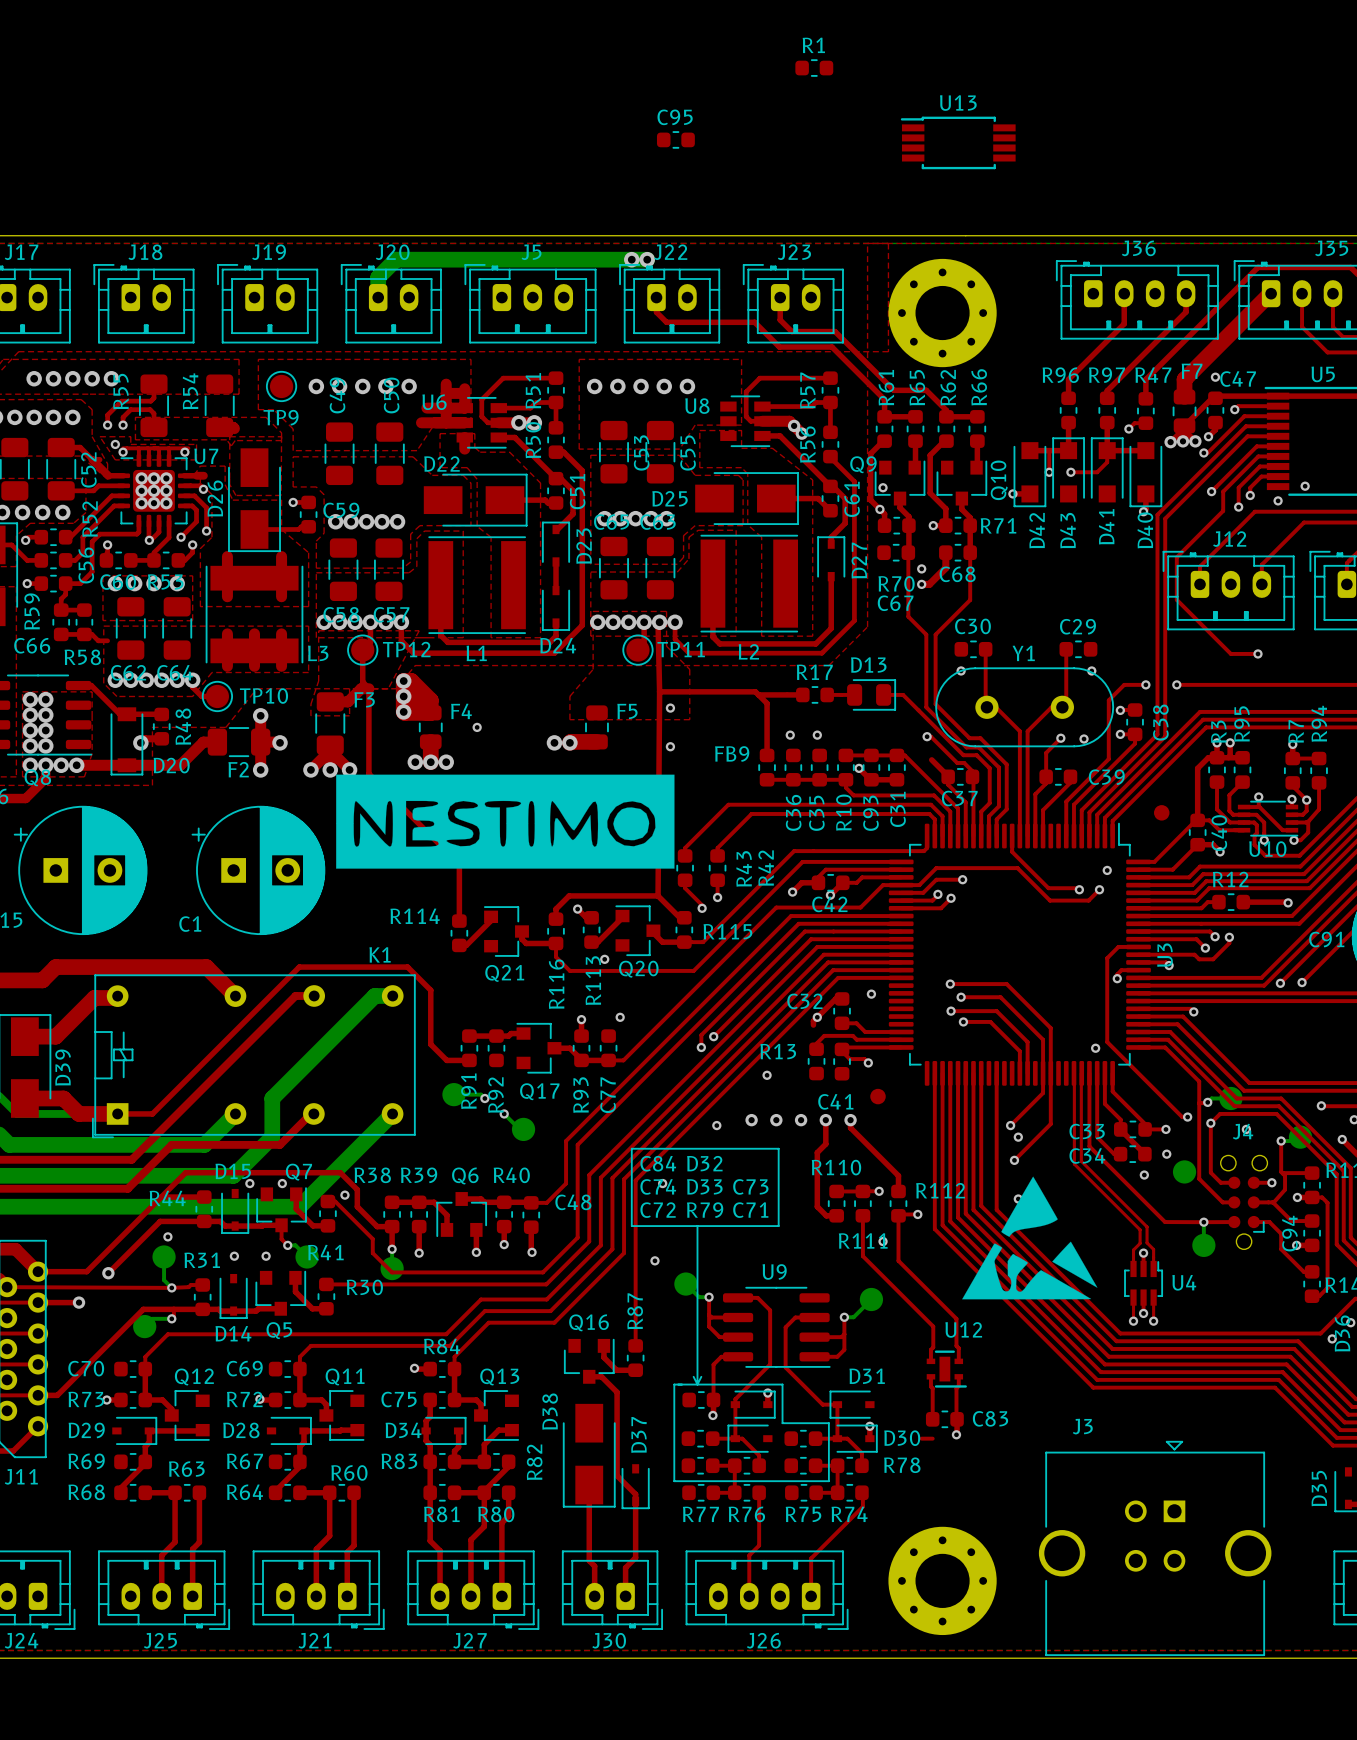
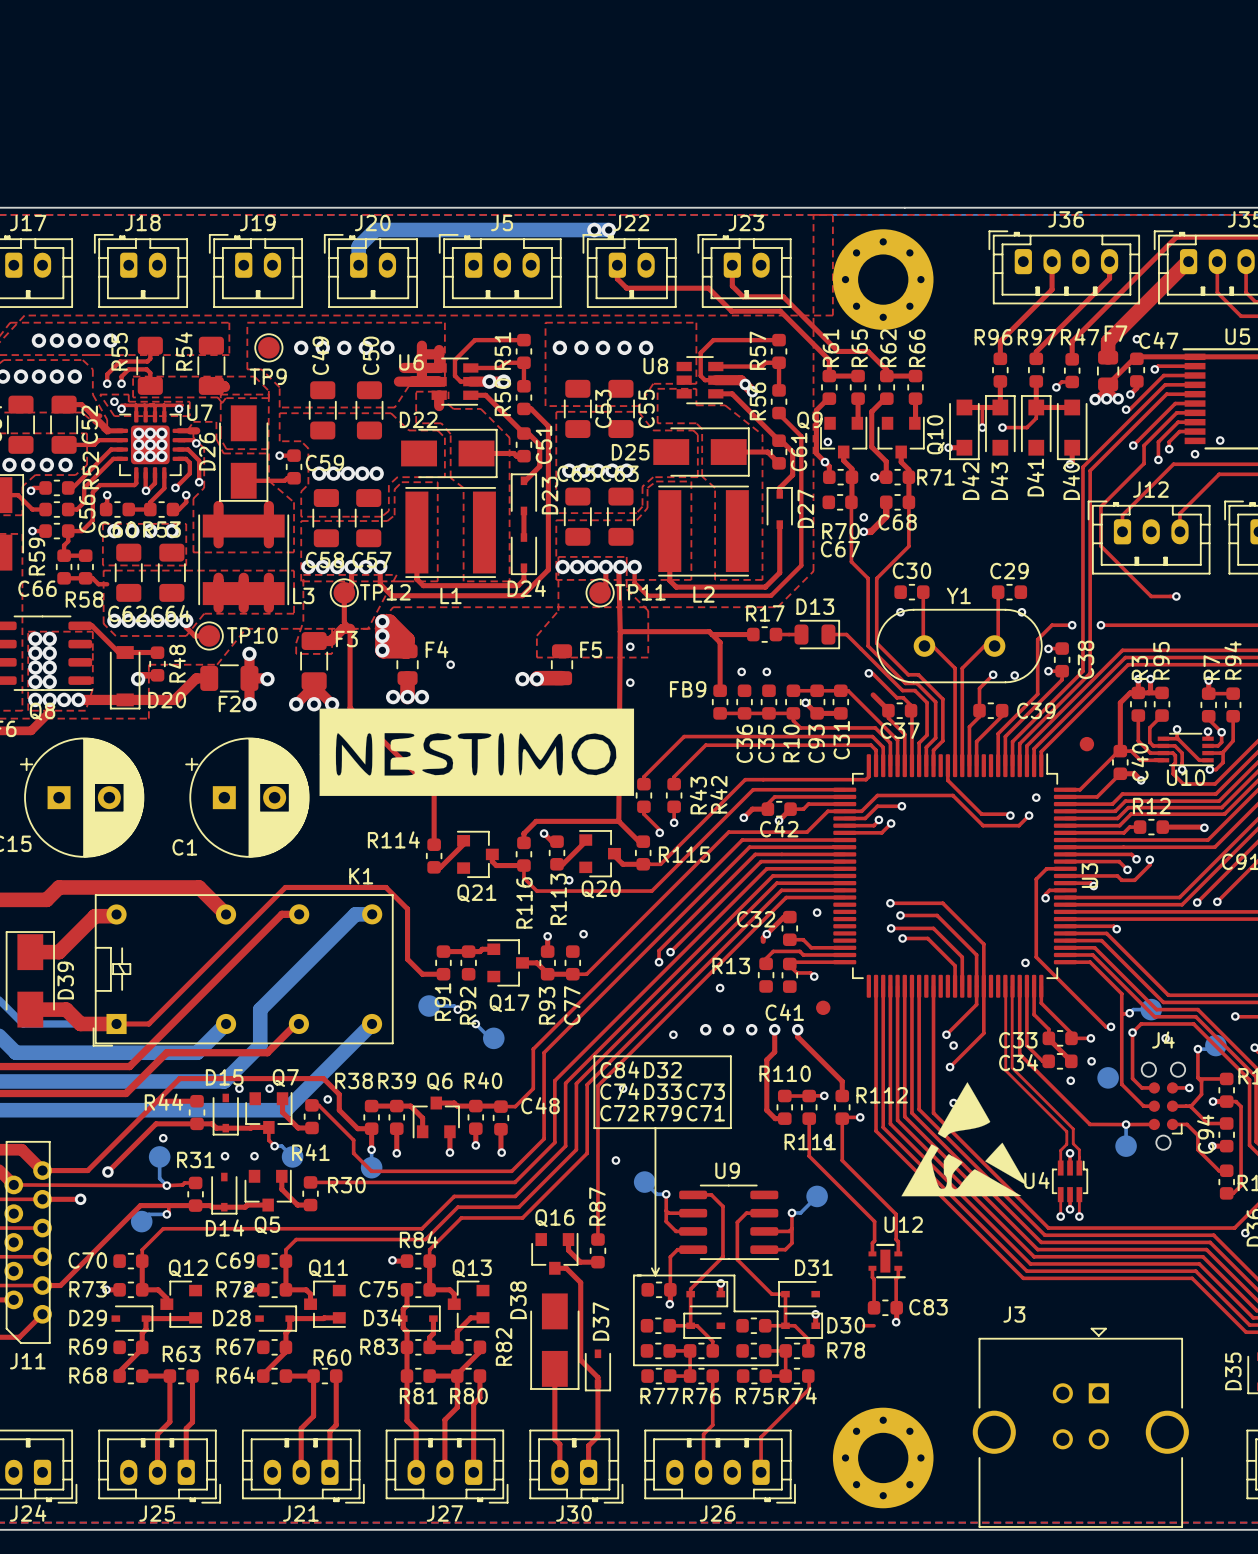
R1: (814, 68) -> none
C95: (675, 139) -> none
U13: (958, 142) -> none
U4 name position: U4 (1184, 1282) -> U4 (1036, 1180)

